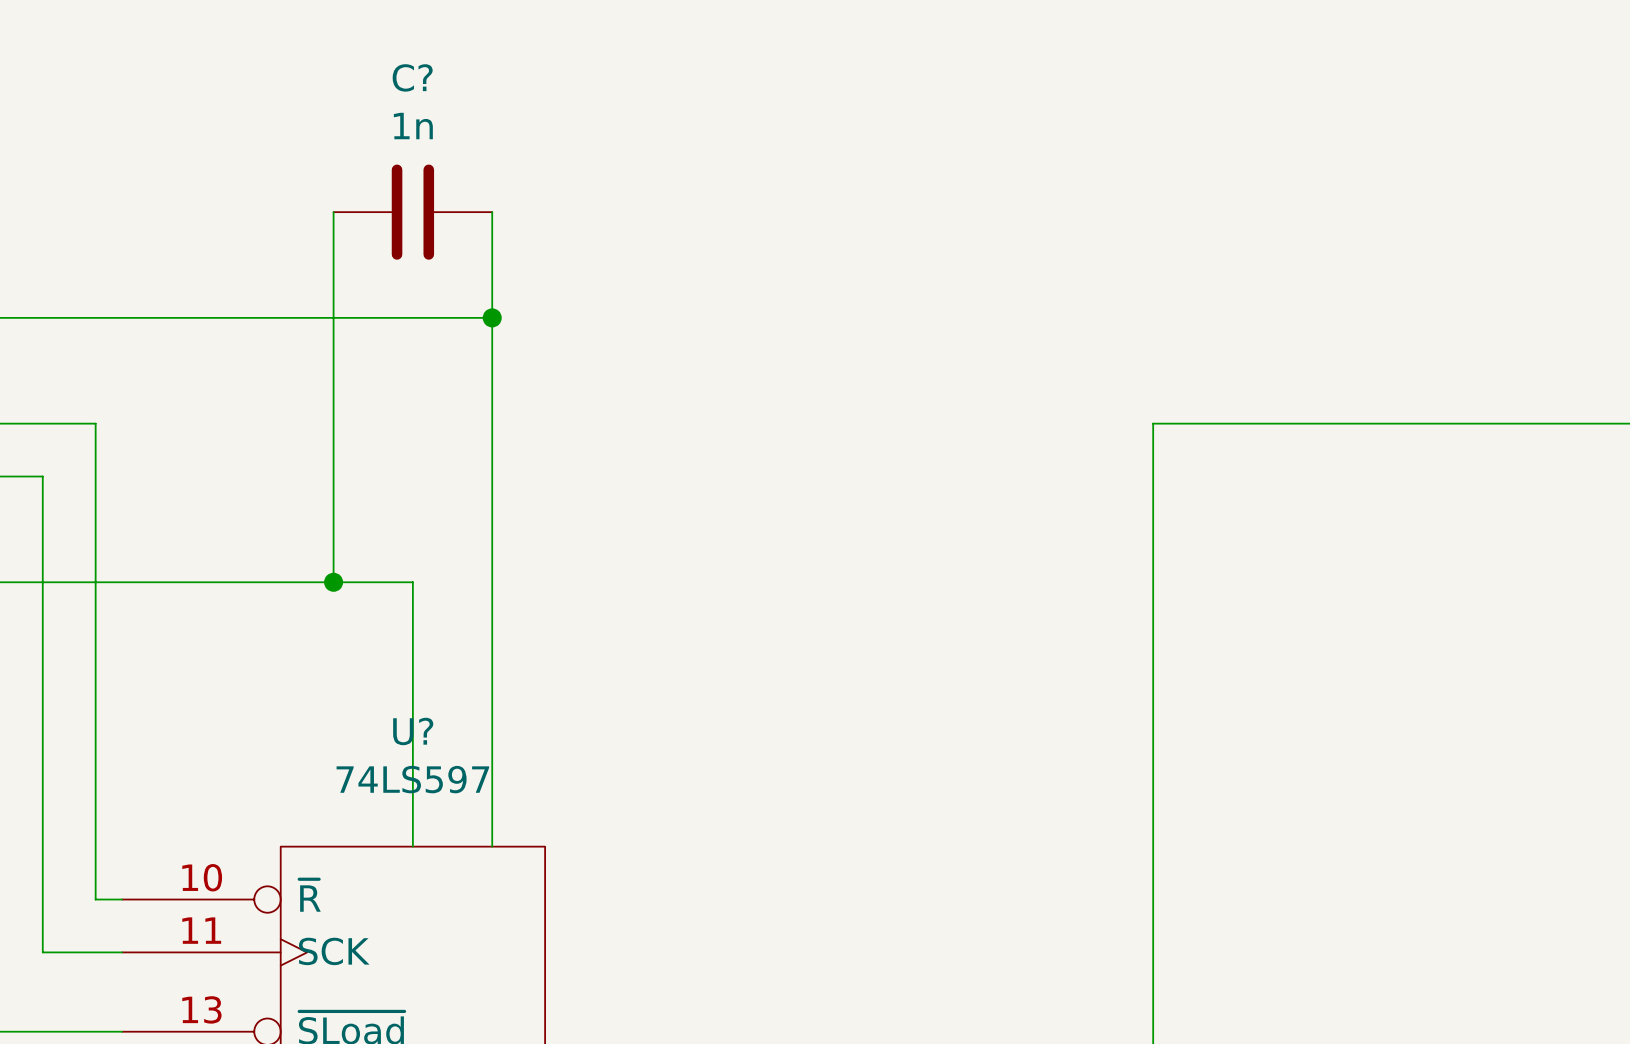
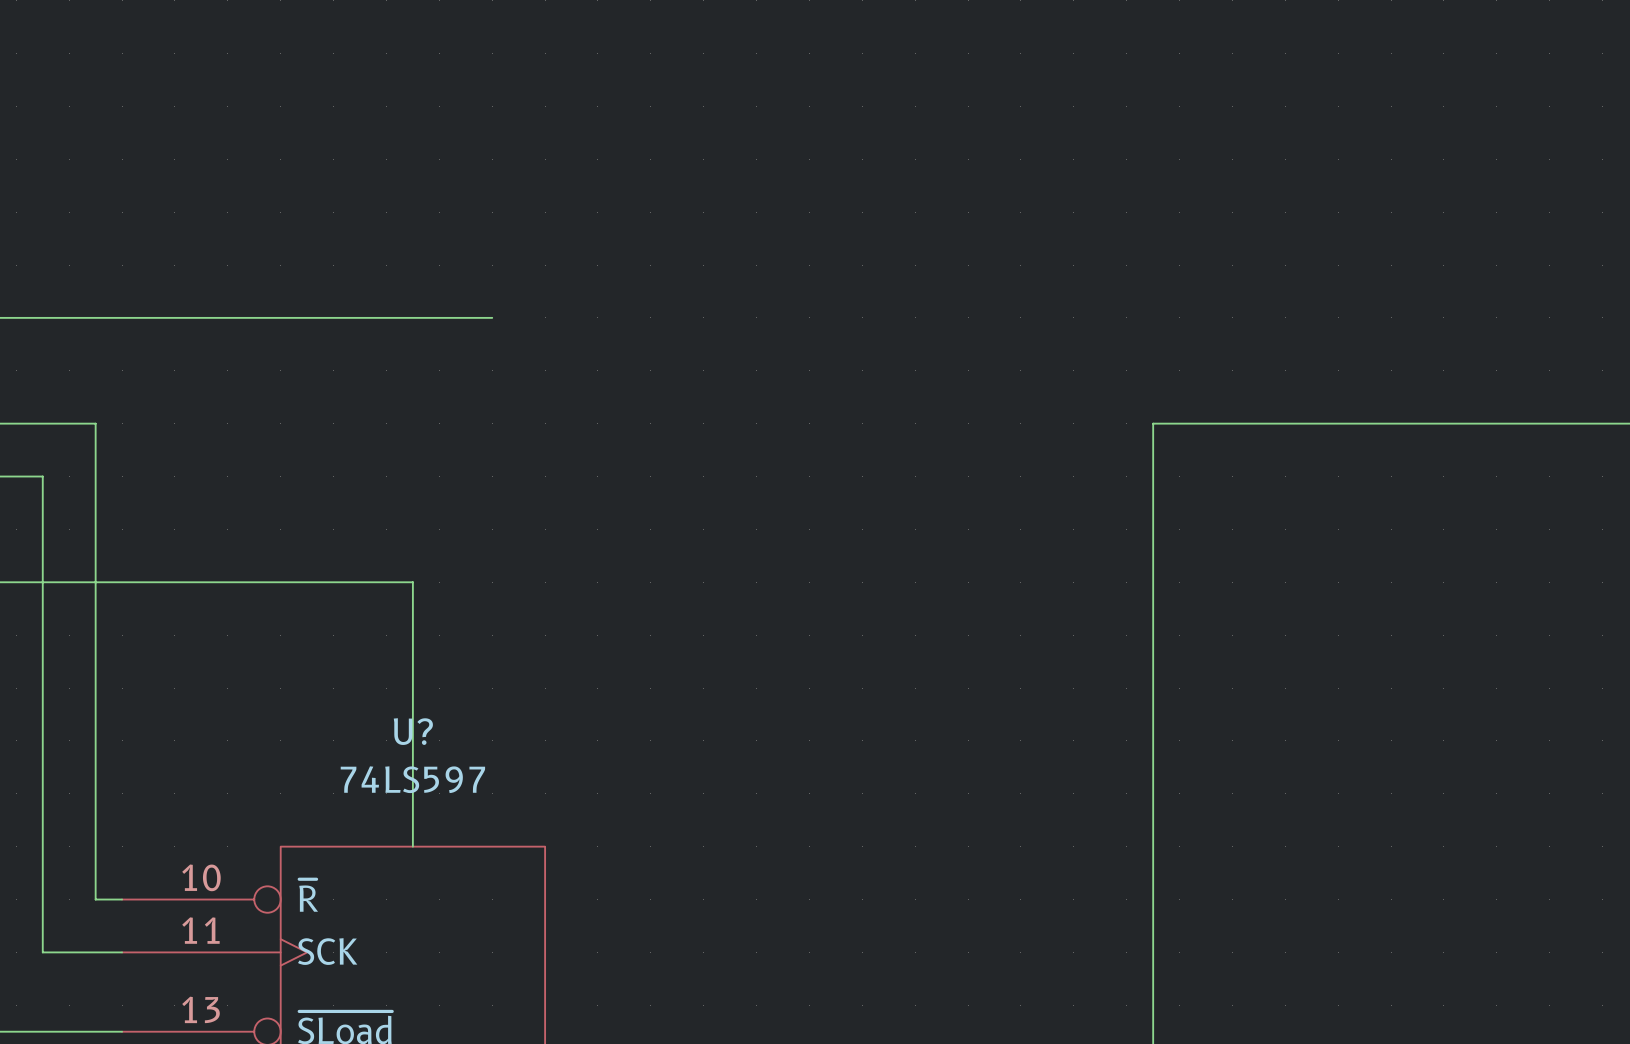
wire: (333, 212) (333, 582) -> none
C?: 1n (412, 212) -> none
wire: (492, 212) (492, 846) -> none
junction: (492, 317) -> none
junction: (333, 582) -> none

